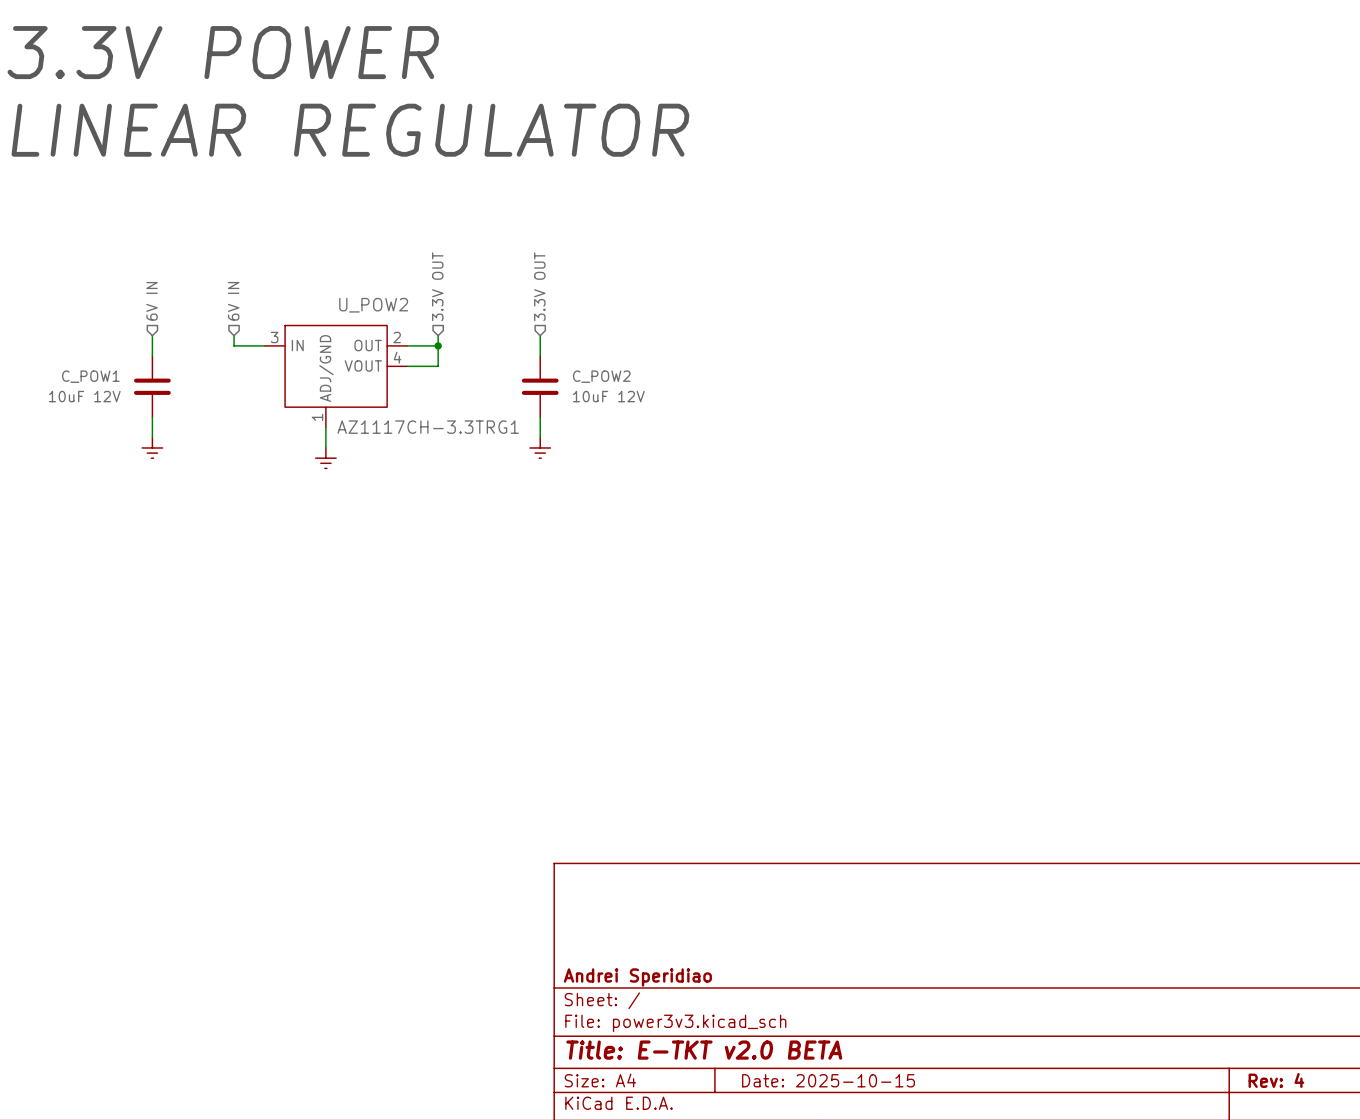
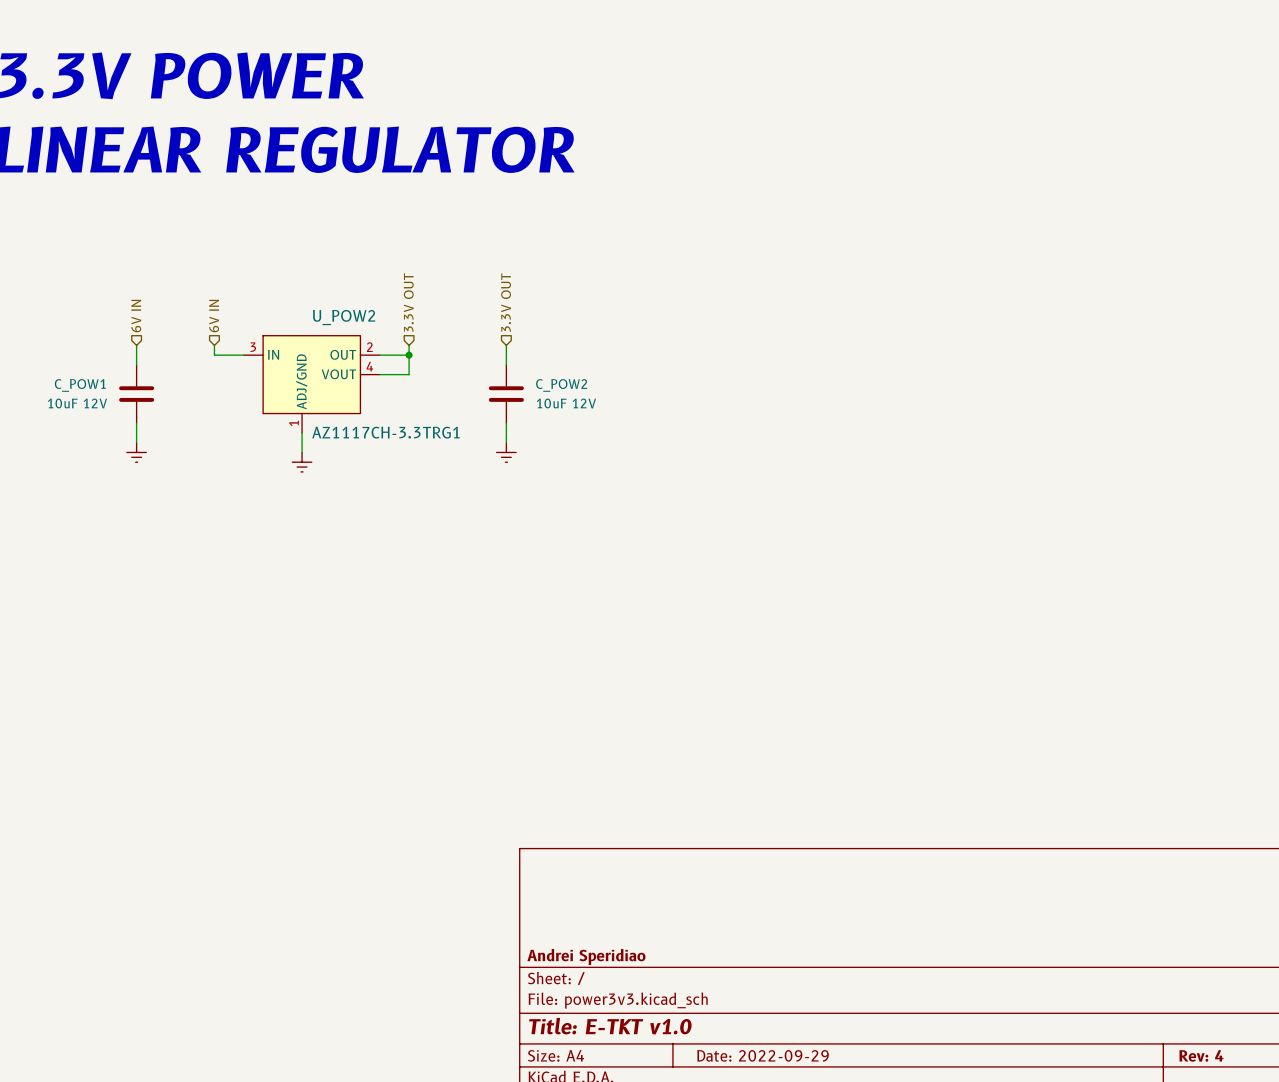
title block: Title: E-TKT v2.0 BETA (704, 1050) -> Title: E-TKT v1.0 (610, 1026)
title block: Date: 2025-10-15 (828, 1080) -> Date: 2022-09-29 (763, 1055)

